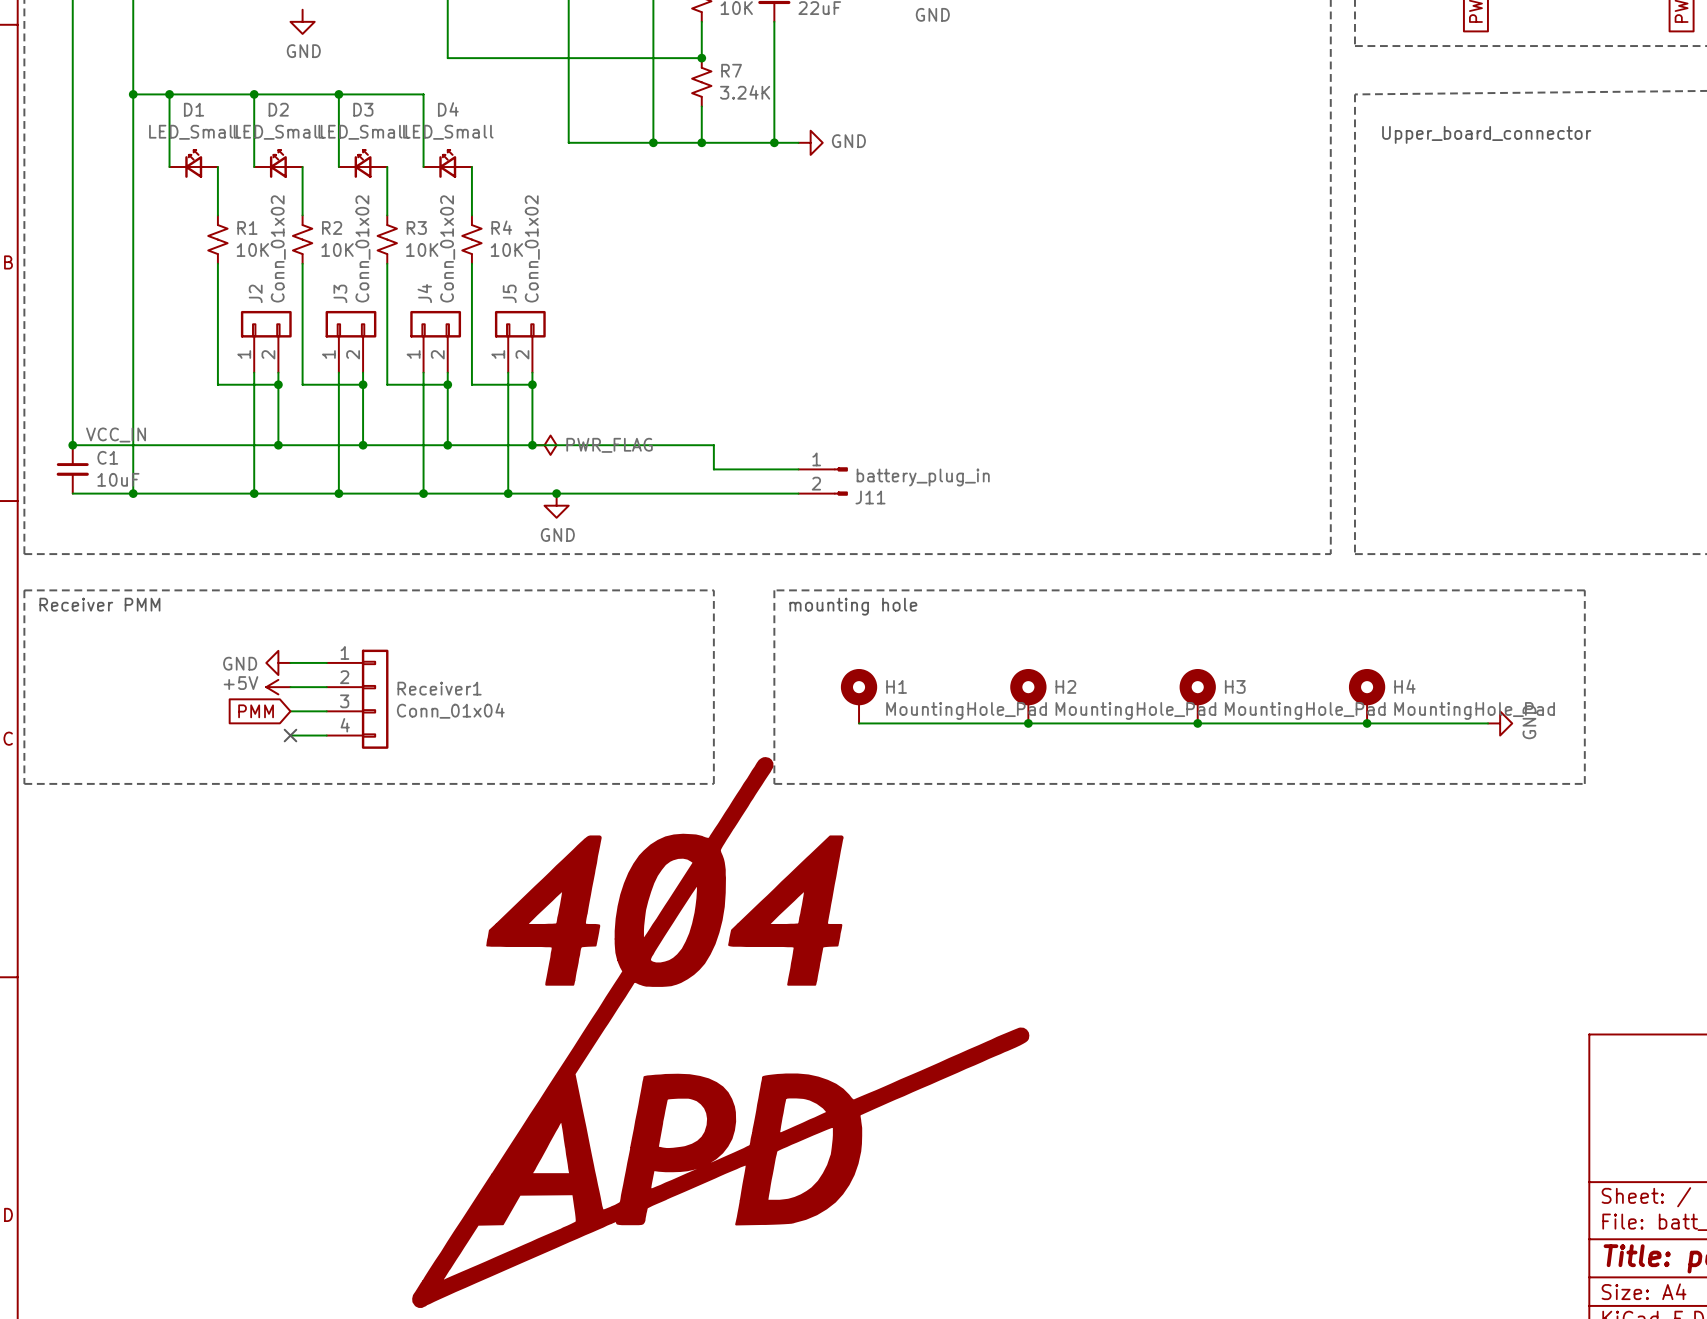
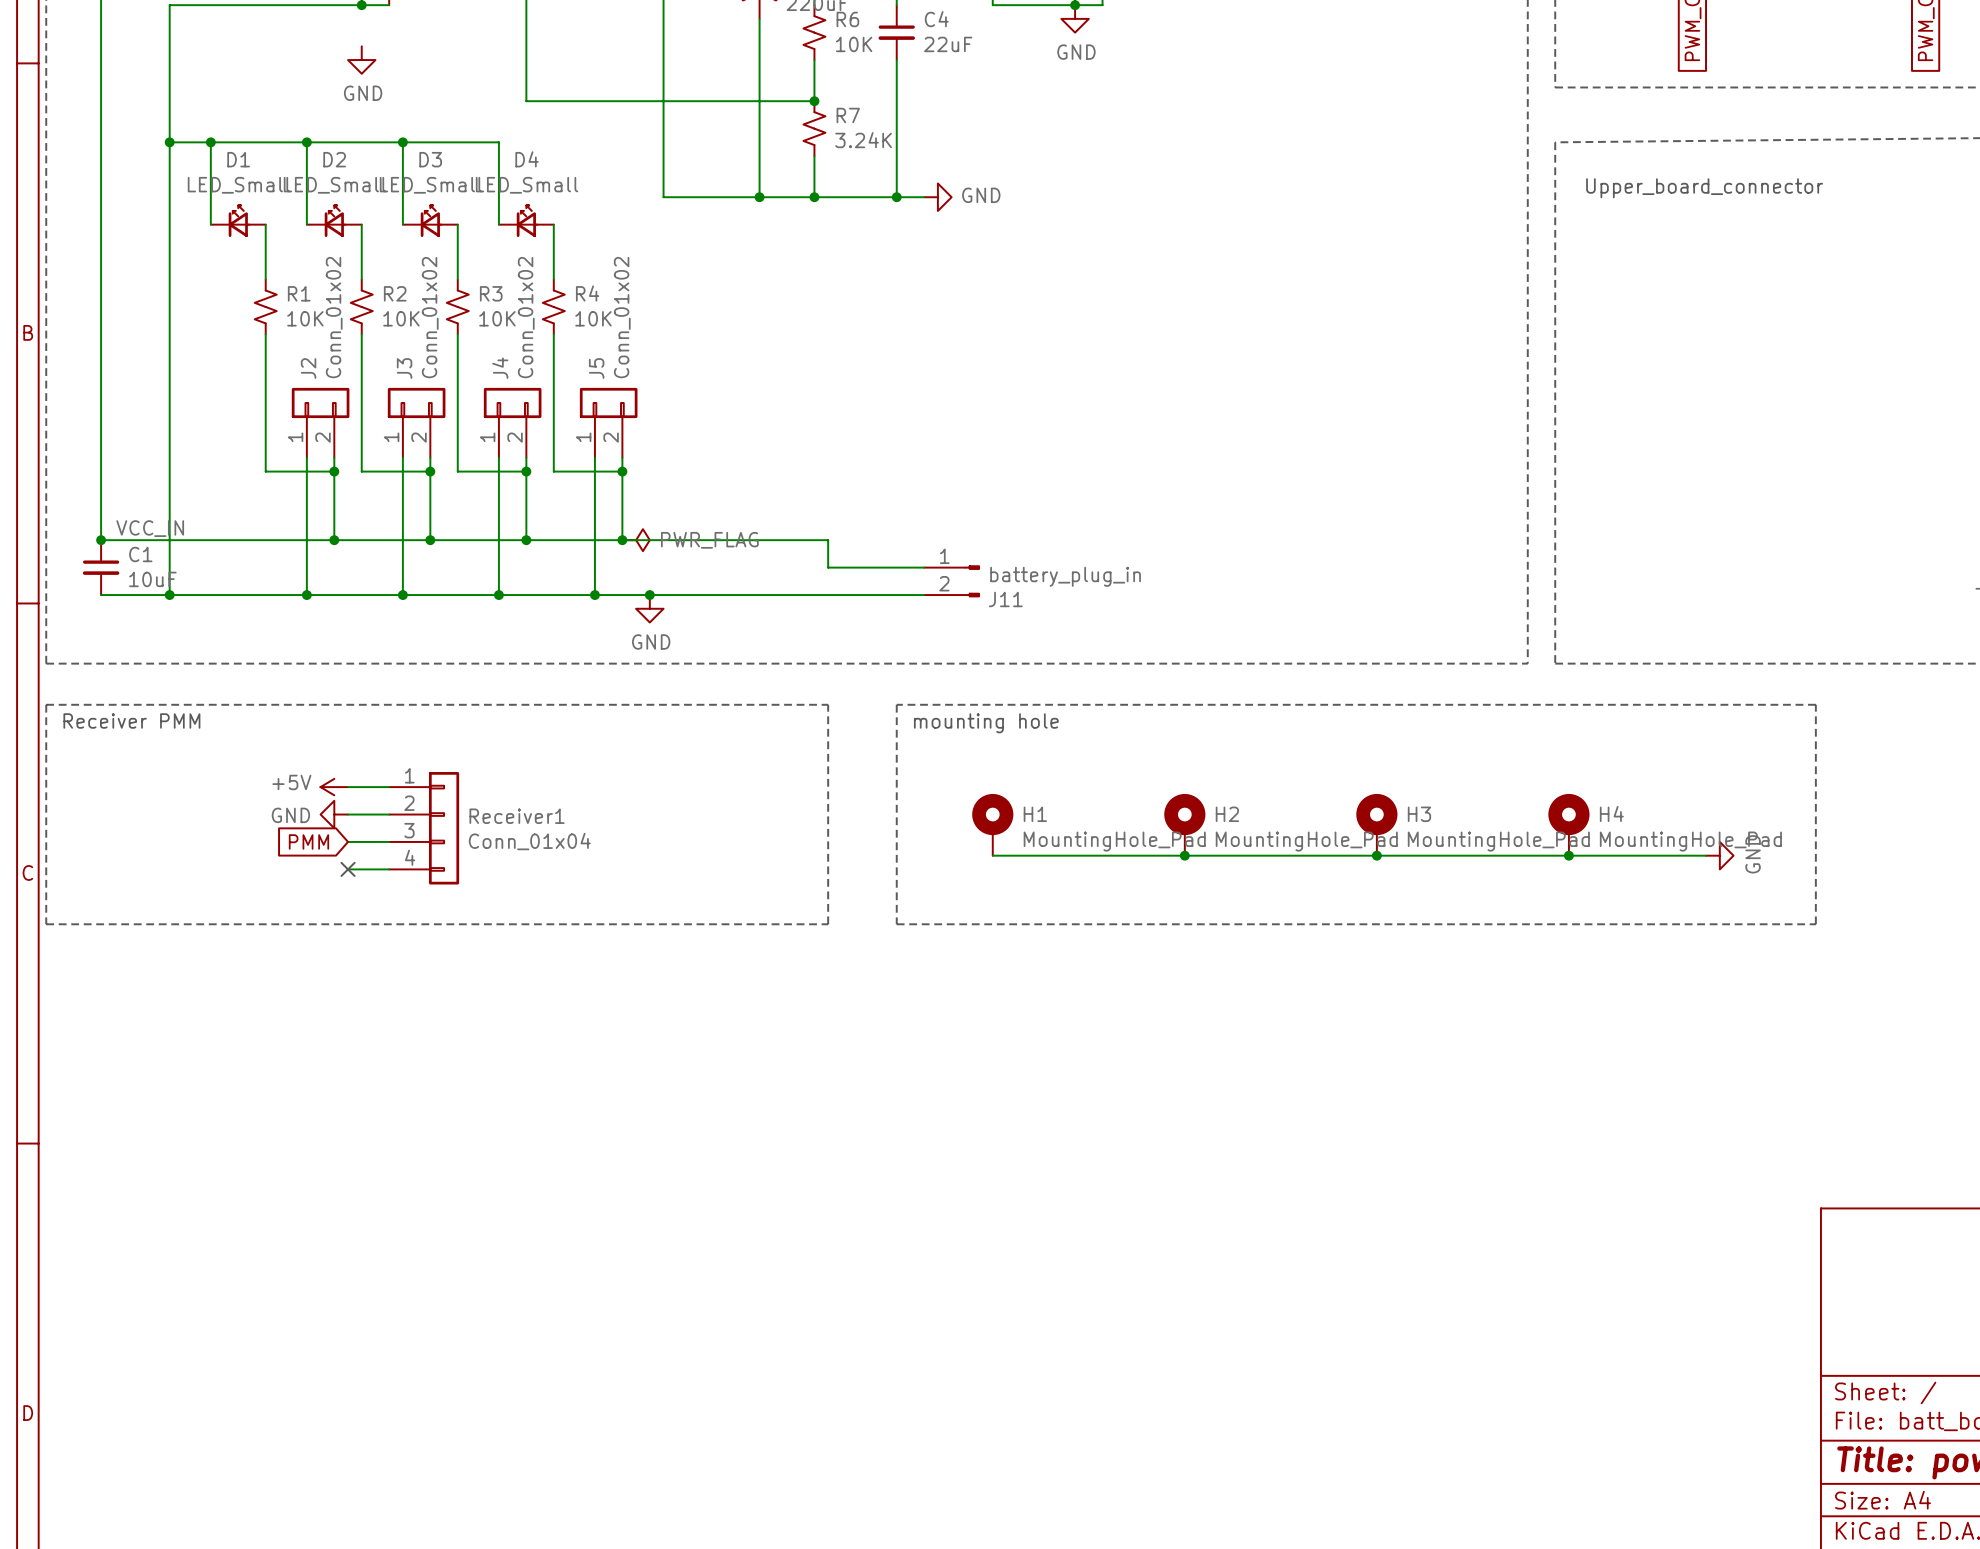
power symbol: GND (278, 662) -> +5V (334, 787)
power symbol: +5V (278, 687) -> GND (334, 814)
power symbol: (720, 1032) -> none

